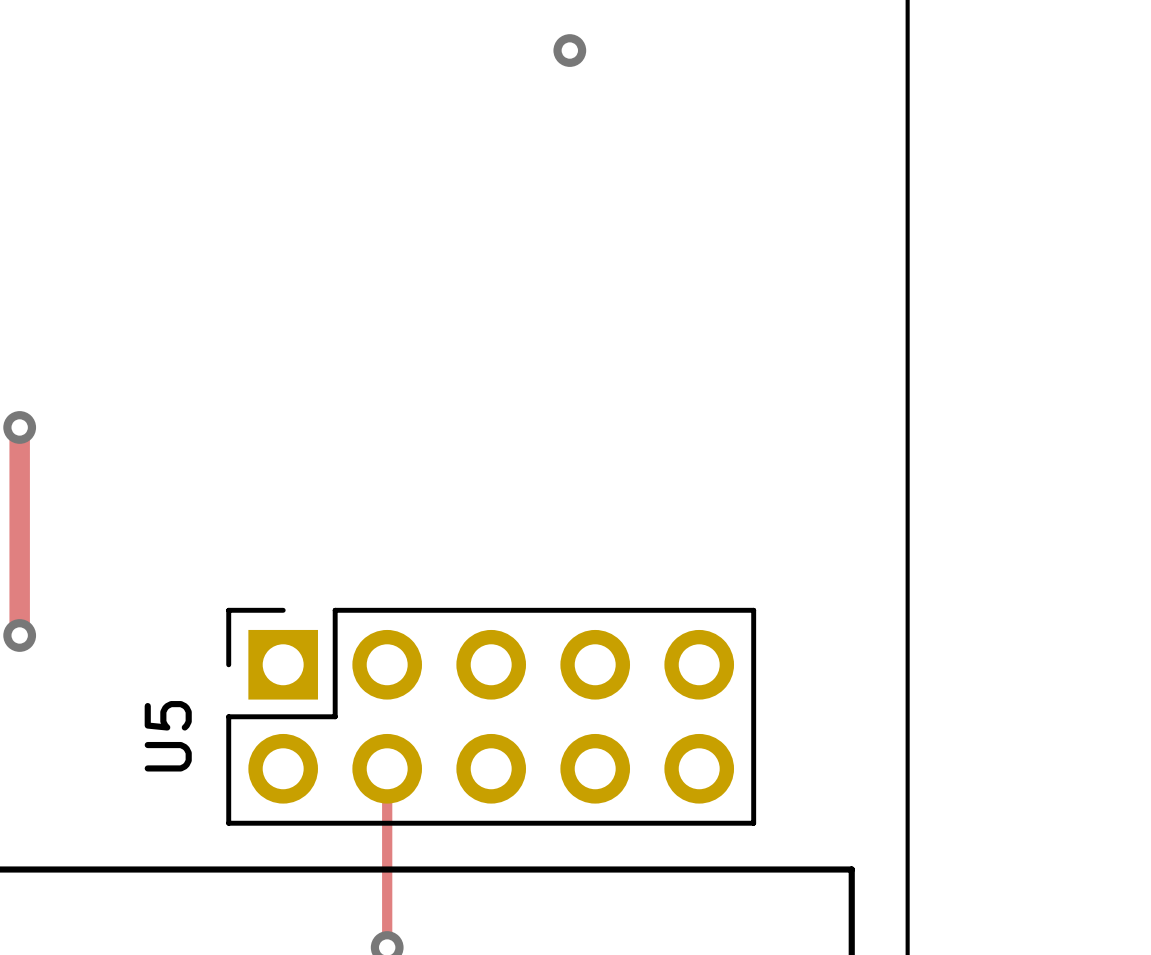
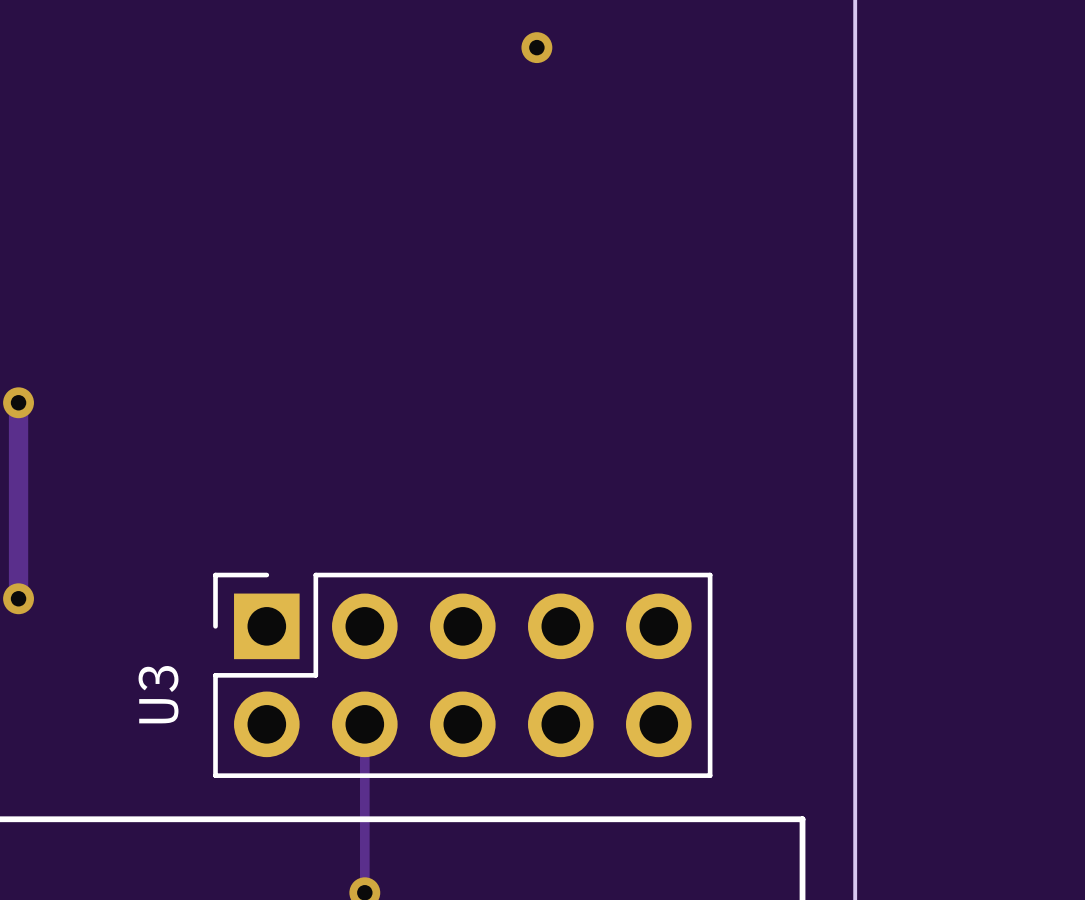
U5 name: U5 (168, 736) -> U3 (158, 694)

